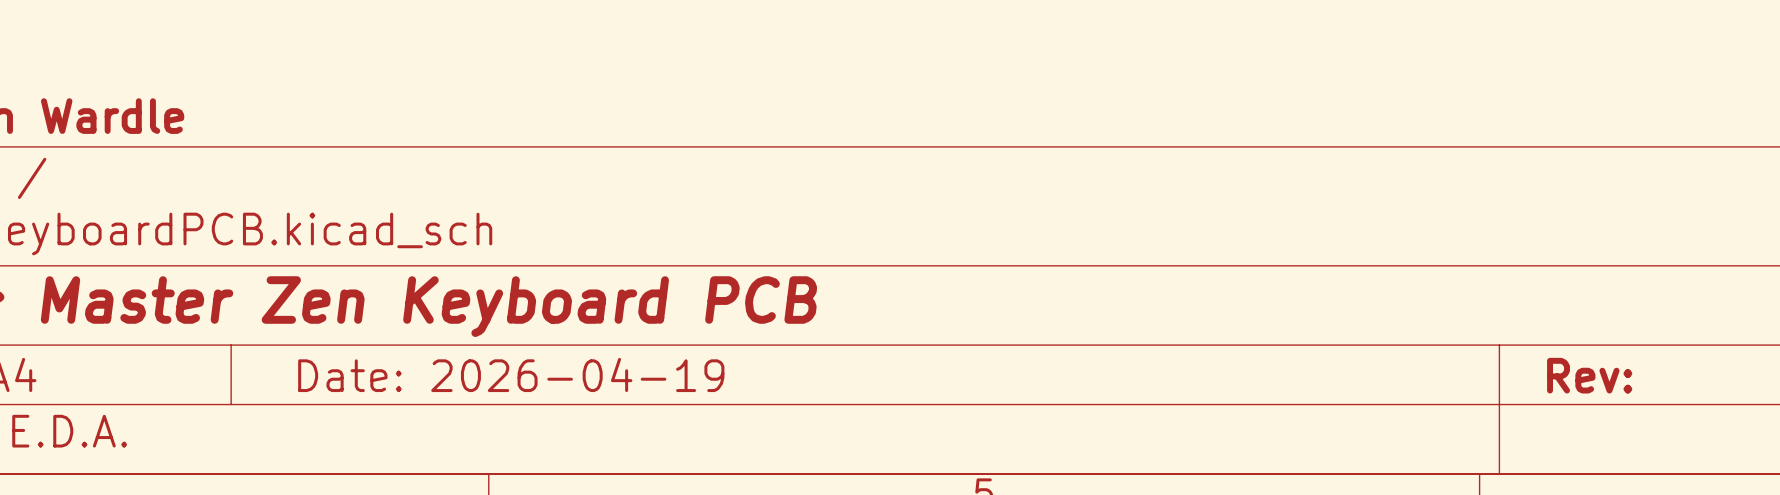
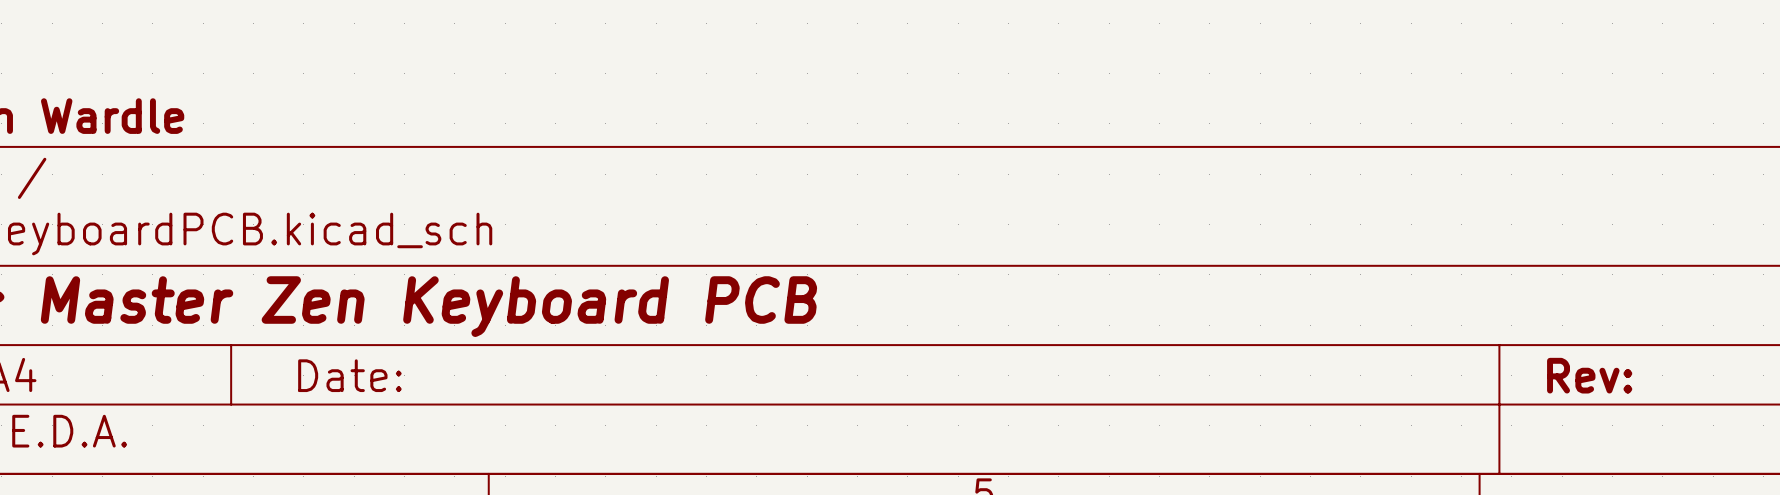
title block: Date: 2026-04-19 (511, 374) -> Date: (349, 375)

